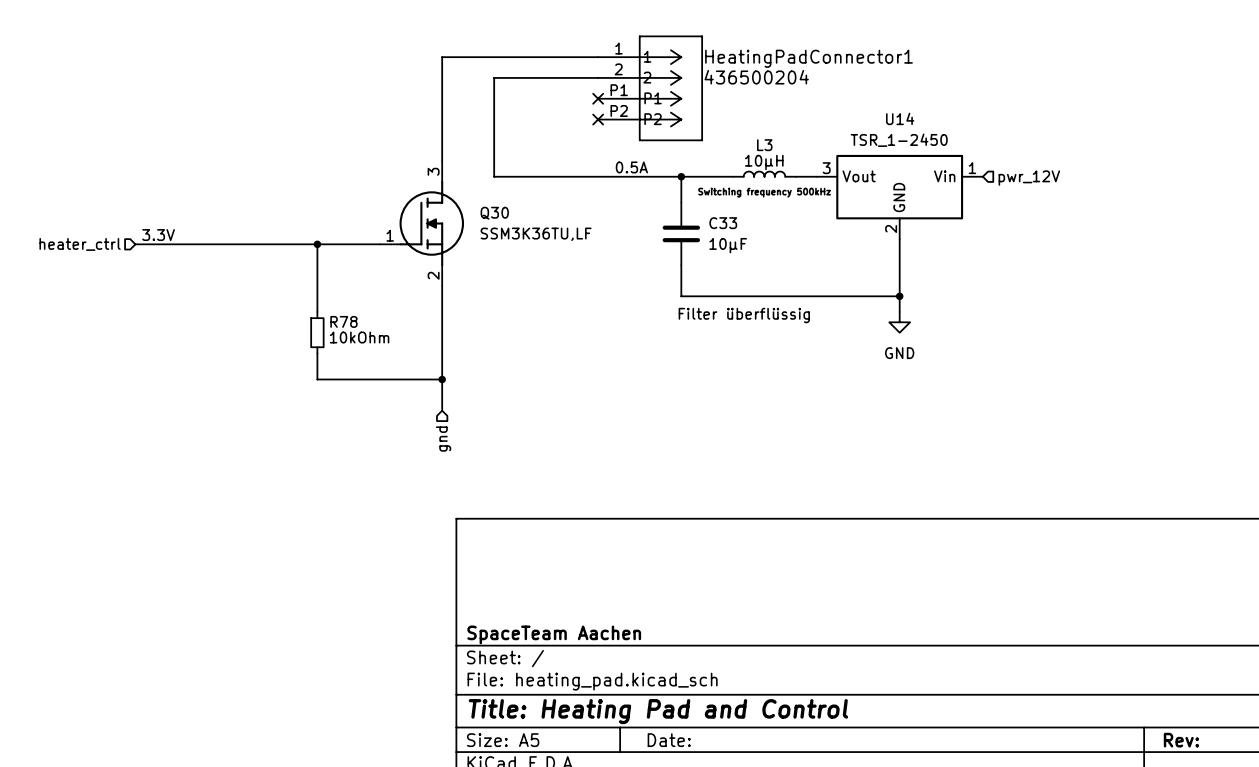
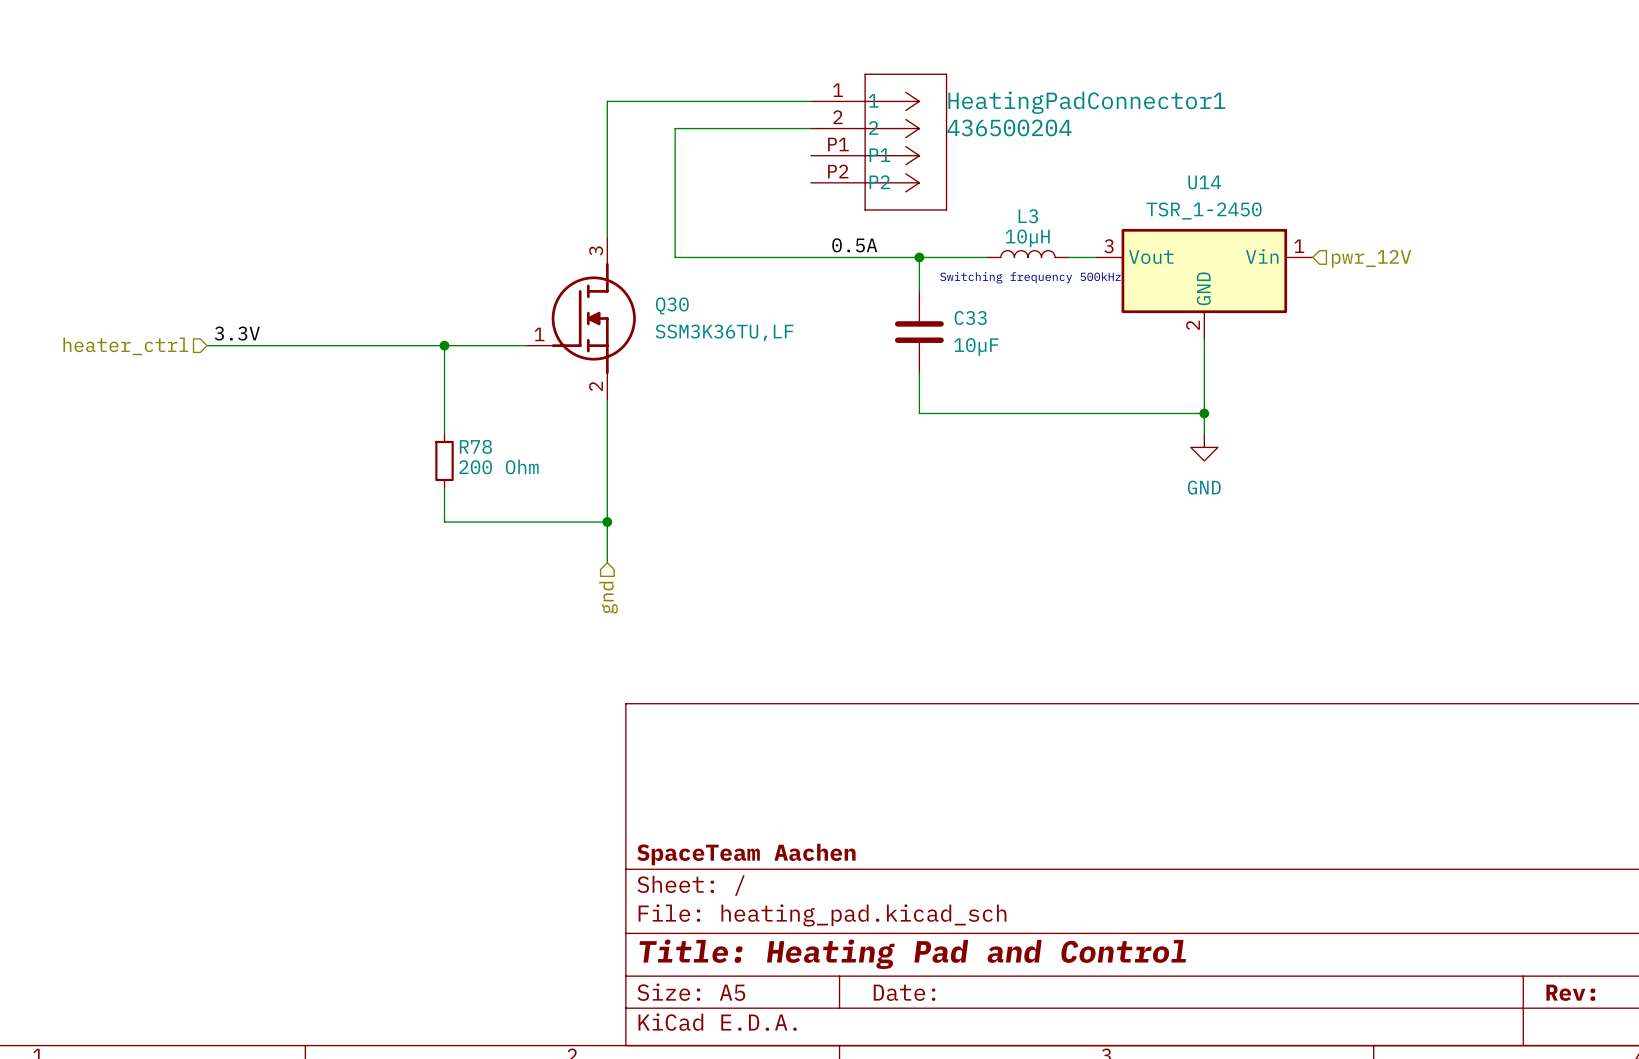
no-connect mark: (598, 98) -> none
no-connect mark: (598, 119) -> none
text: Filter überflüssig (744, 315) -> none
R78 value: 10kOhm (359, 337) -> 200 Ohm (499, 466)

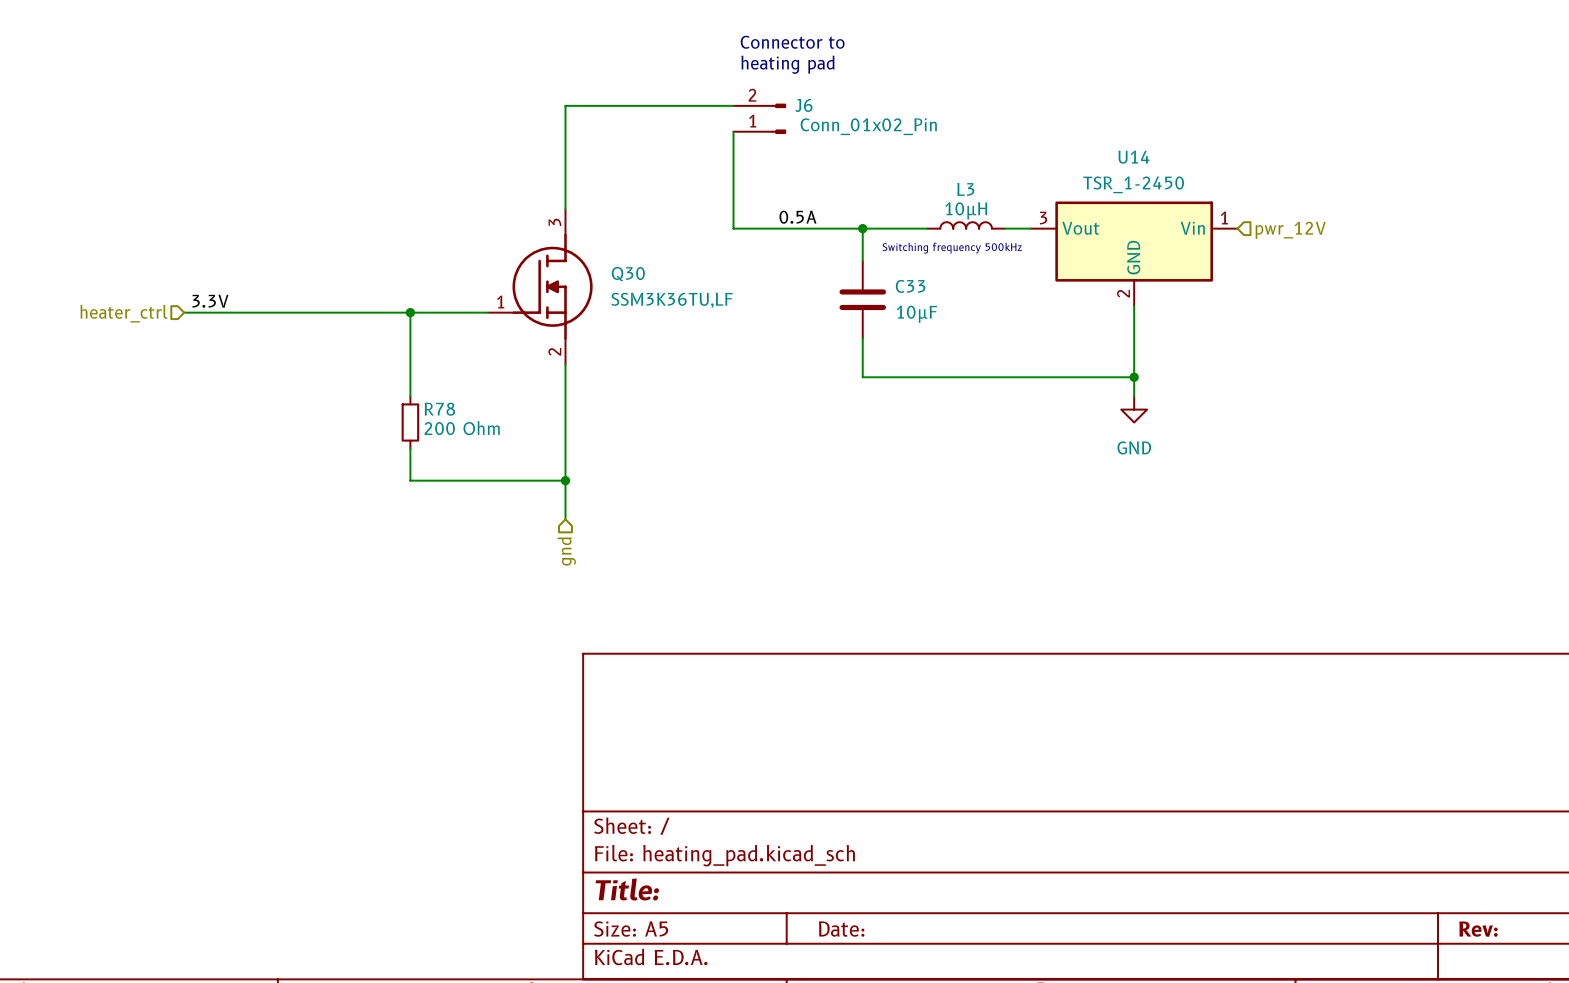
text: none -> Connector to (792, 42)
text: none -> heating pad (788, 64)
wire: (810, 101) (607, 101) (607, 128) -> (630, 105) (565, 105)
wire: (675, 128) (675, 257) (783, 257) -> (733, 131) (733, 228)
J6: none -> Conn_01x02_Pin (759, 118)
HeatingPadConnector1: 436500204 (879, 142) -> none
title block: SpaceTeam Aachen (746, 854) -> none
title block: Title: Heating Pad and Control (912, 954) -> Title: (627, 889)

